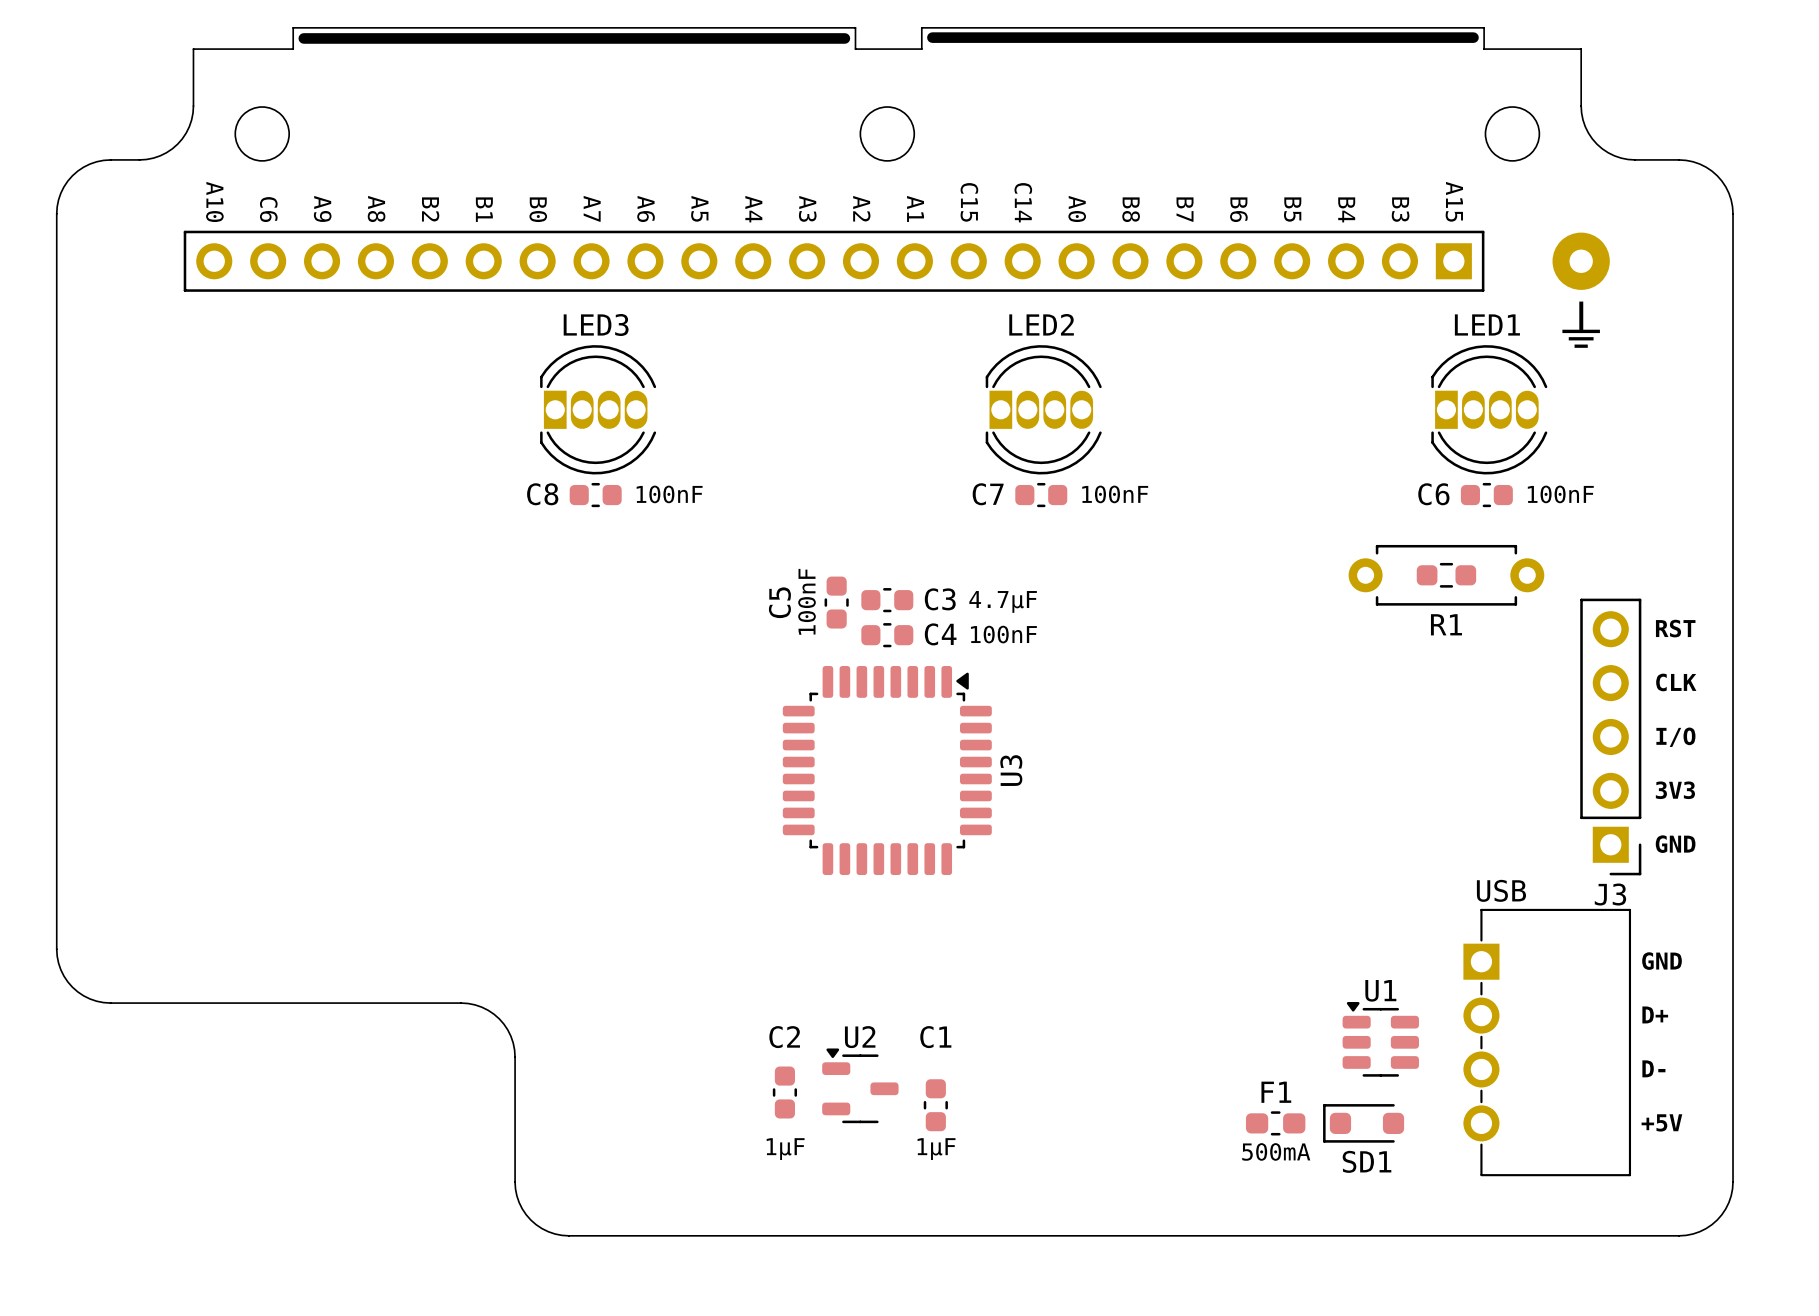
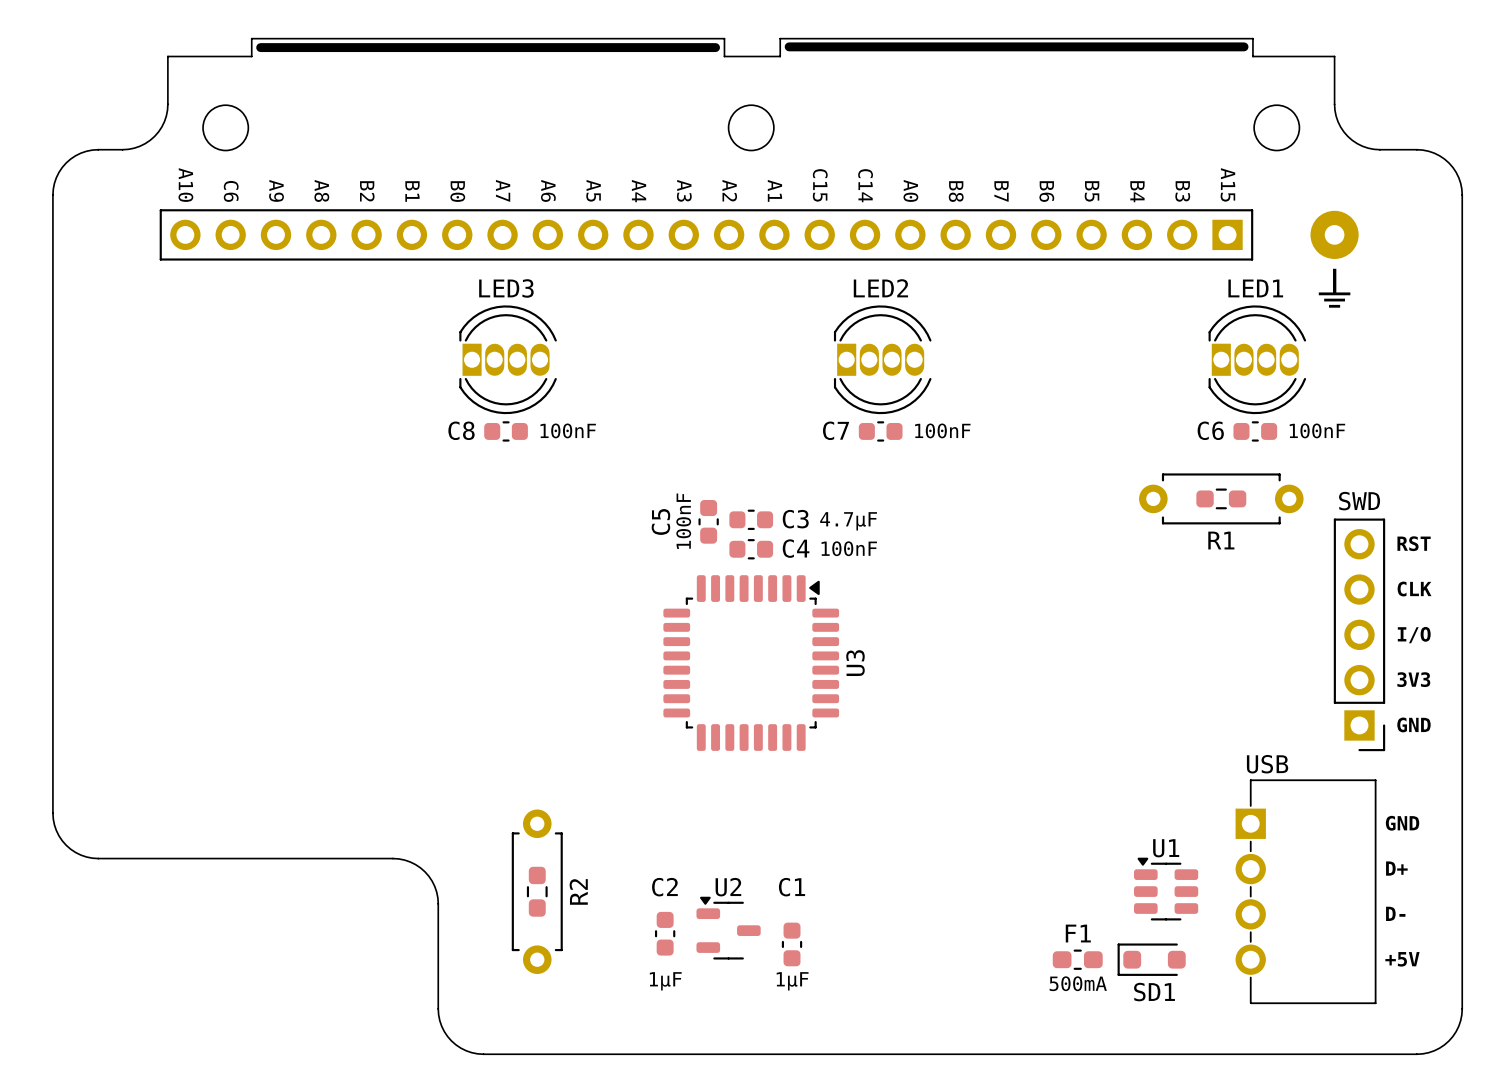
J3 value: none -> SWD (1359, 501)
J3 name: J3 (1610, 894) -> none
R2: none -> (537, 891)

